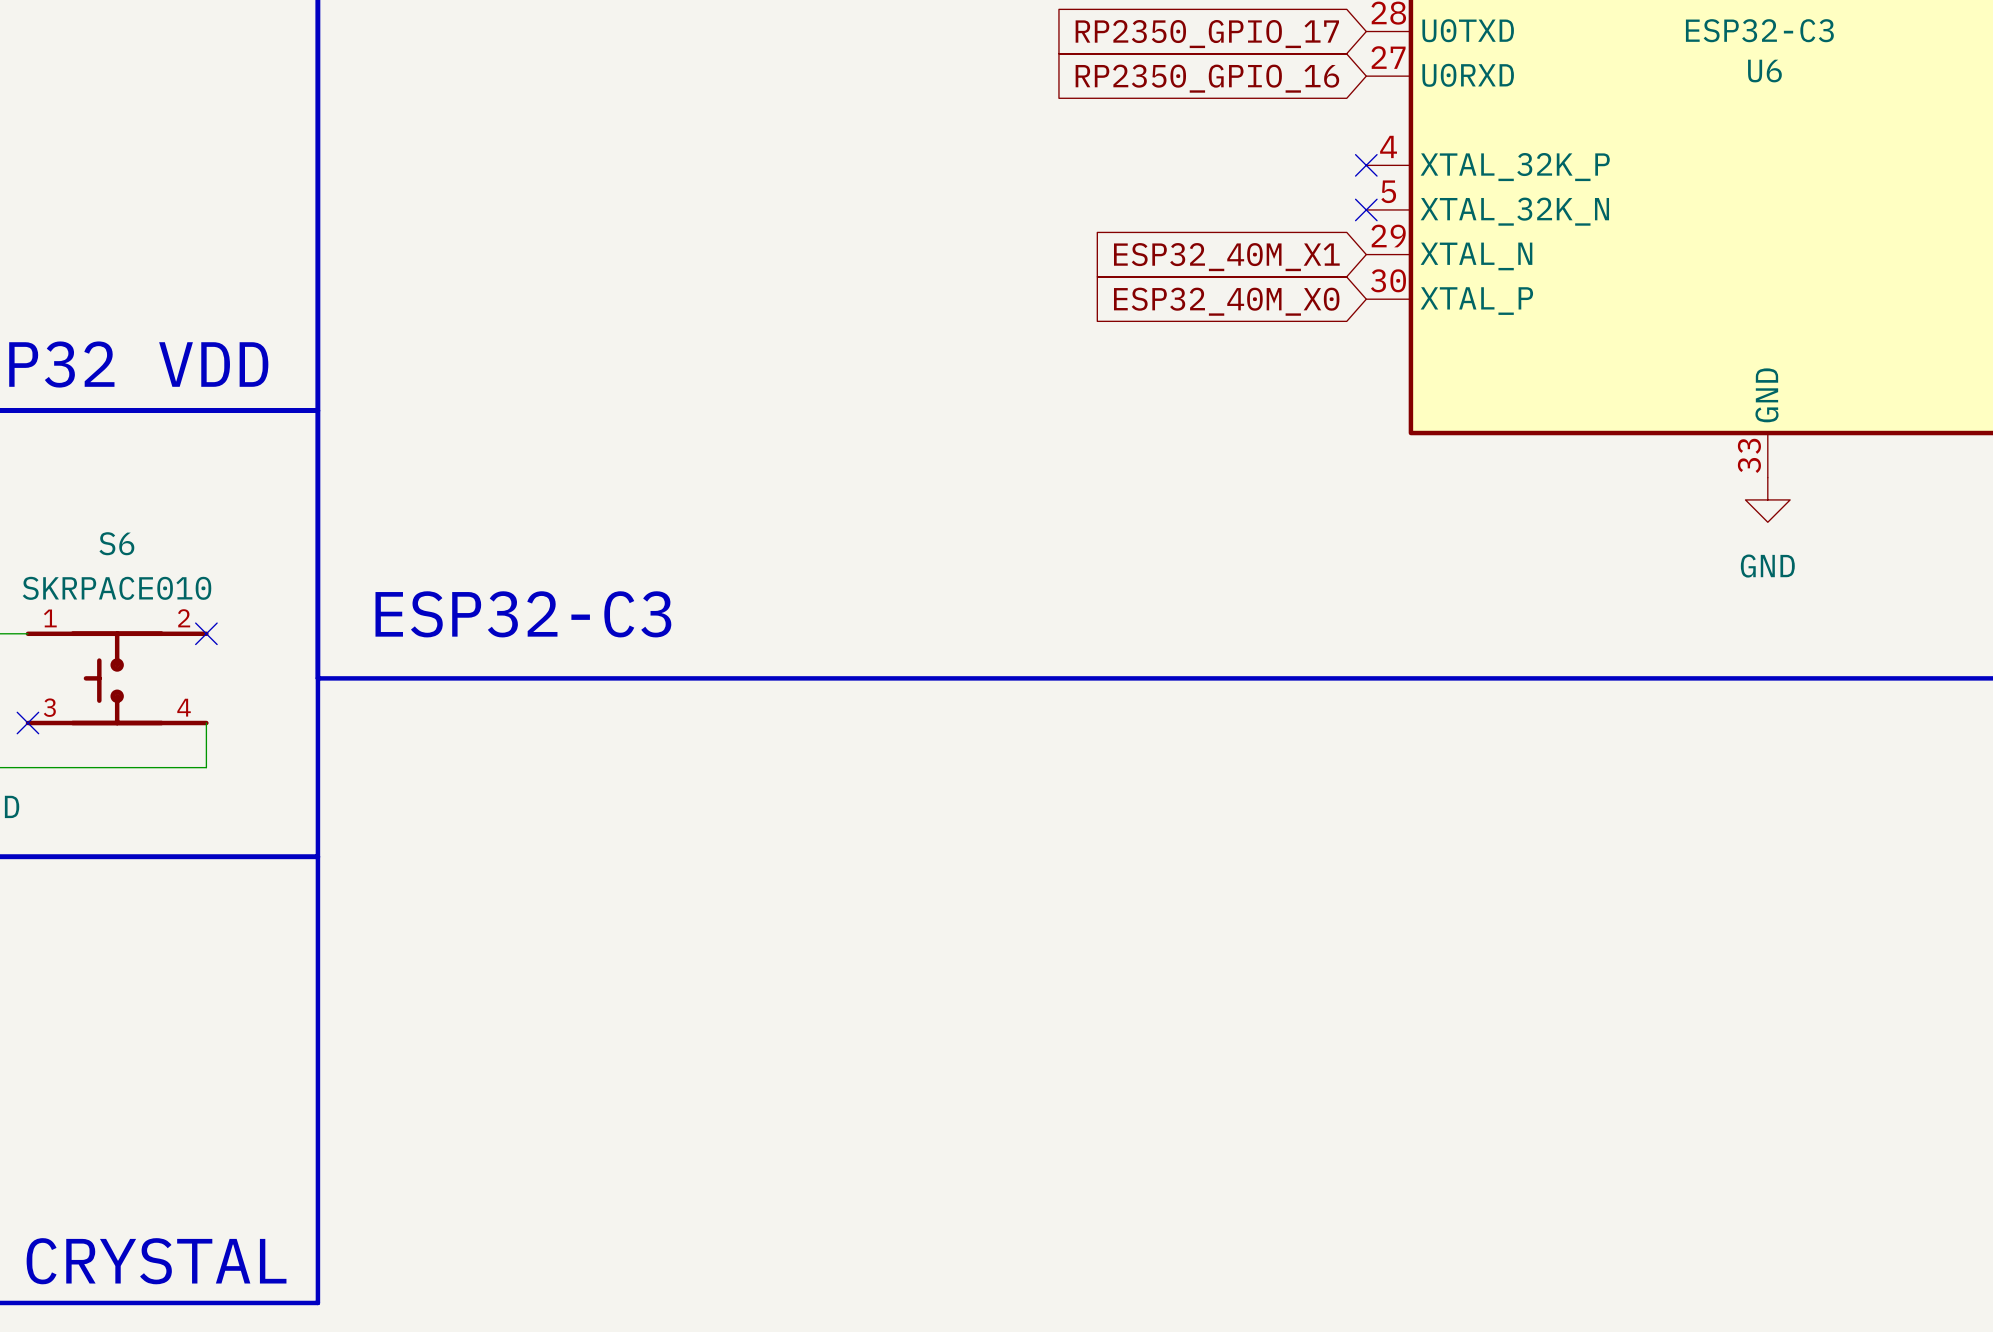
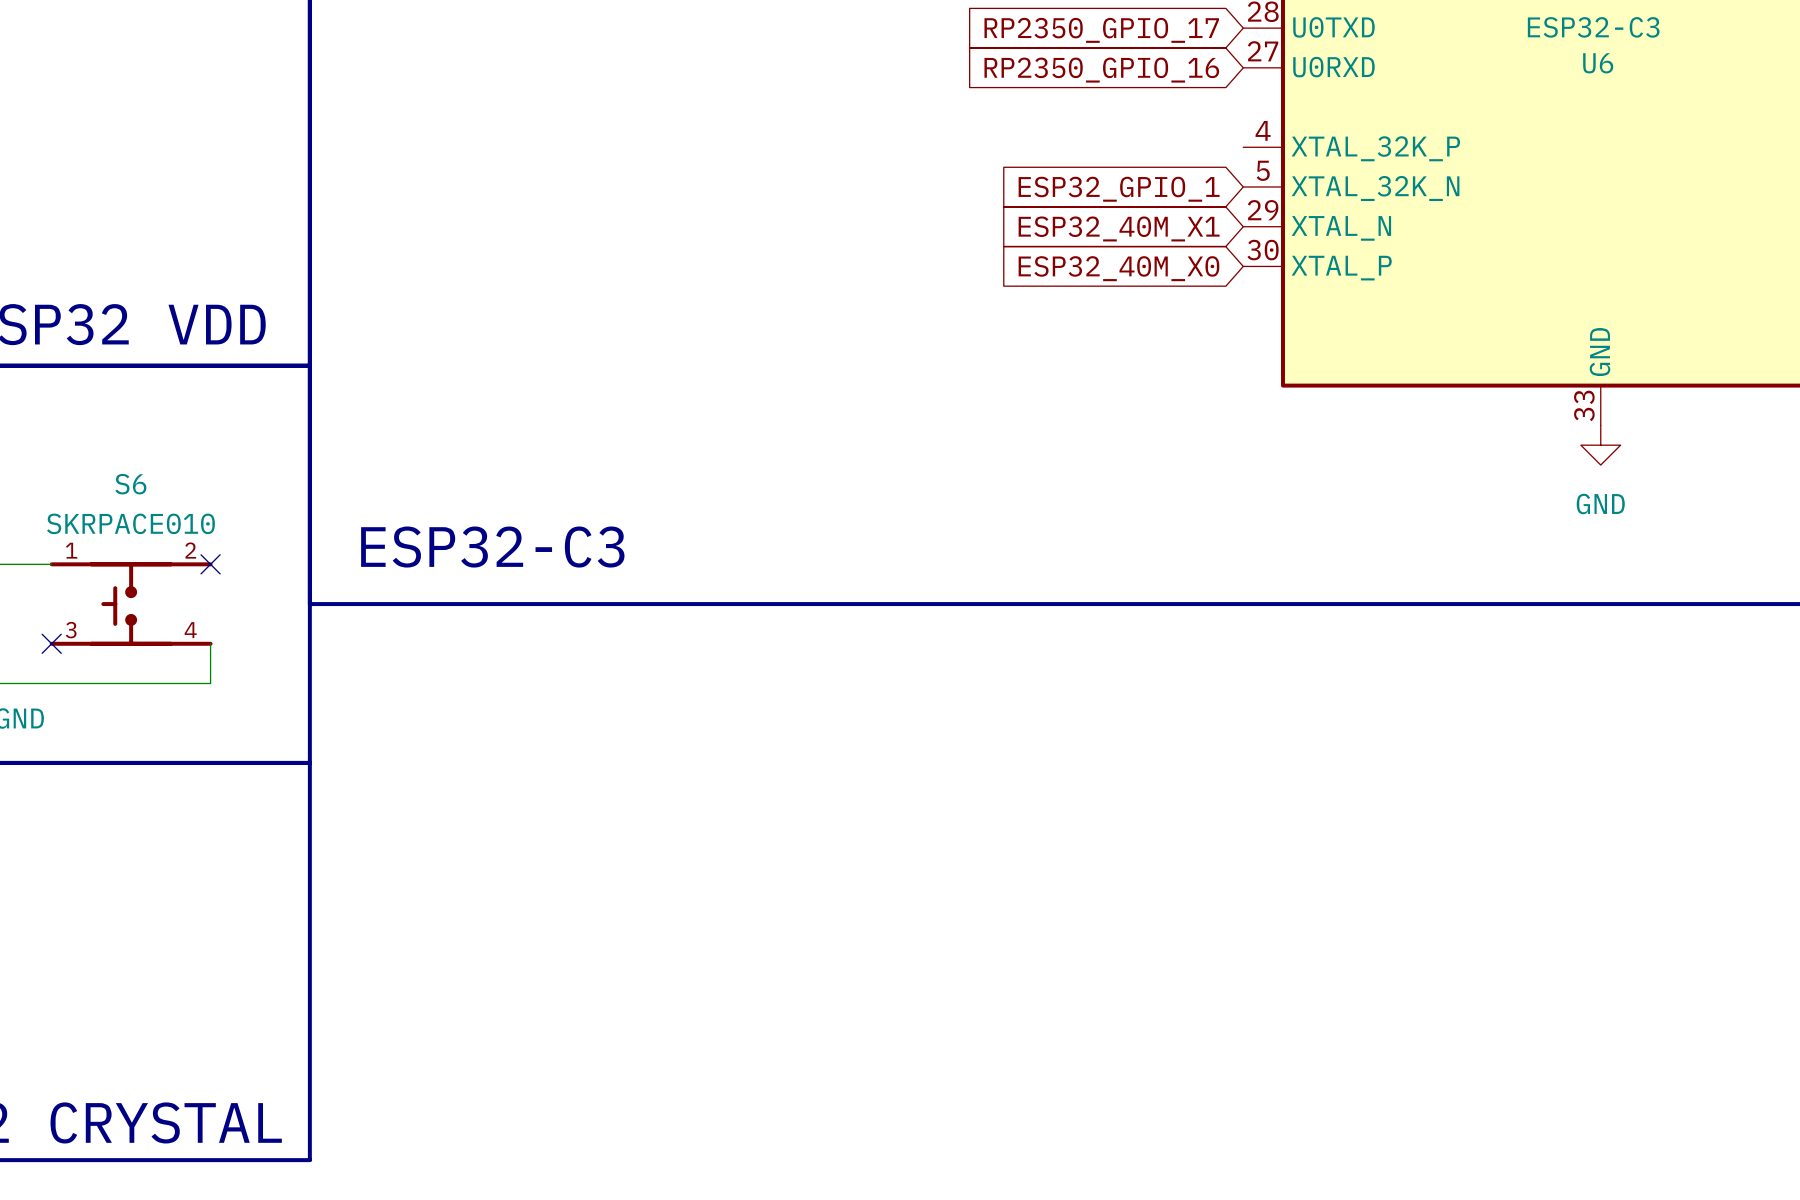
no-connect mark: (1366, 165) -> none
no-connect mark: (1366, 209) -> none
global label: none -> ESP32_GPIO_1 (1119, 189)

